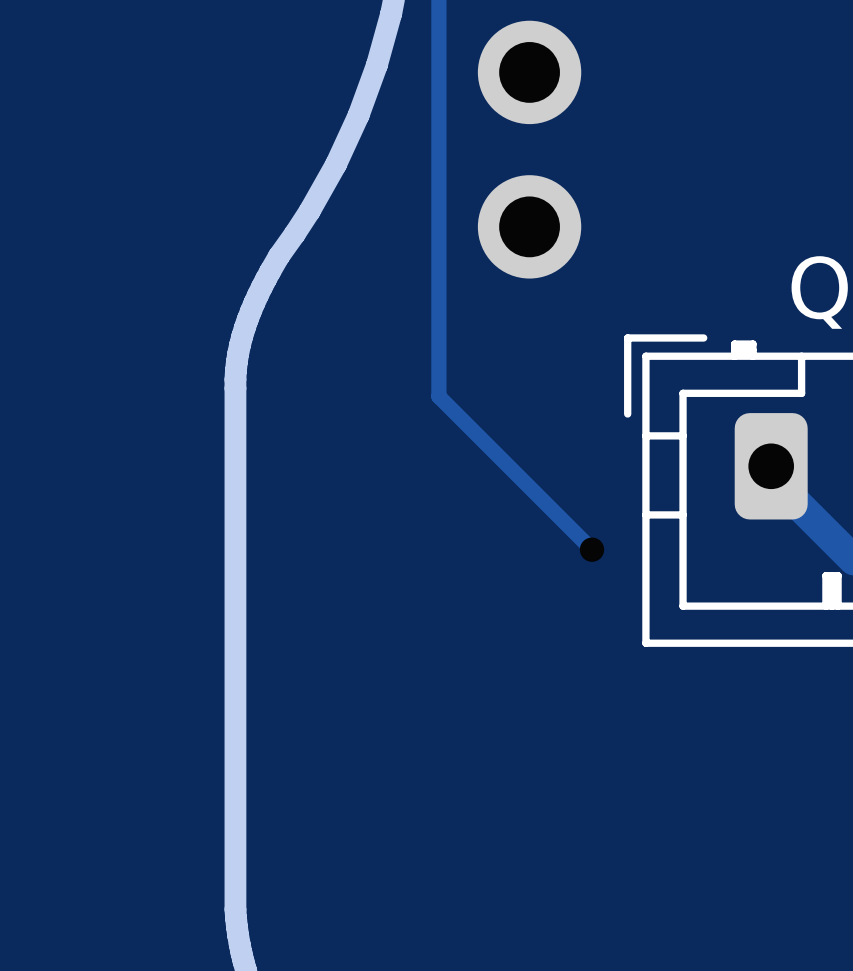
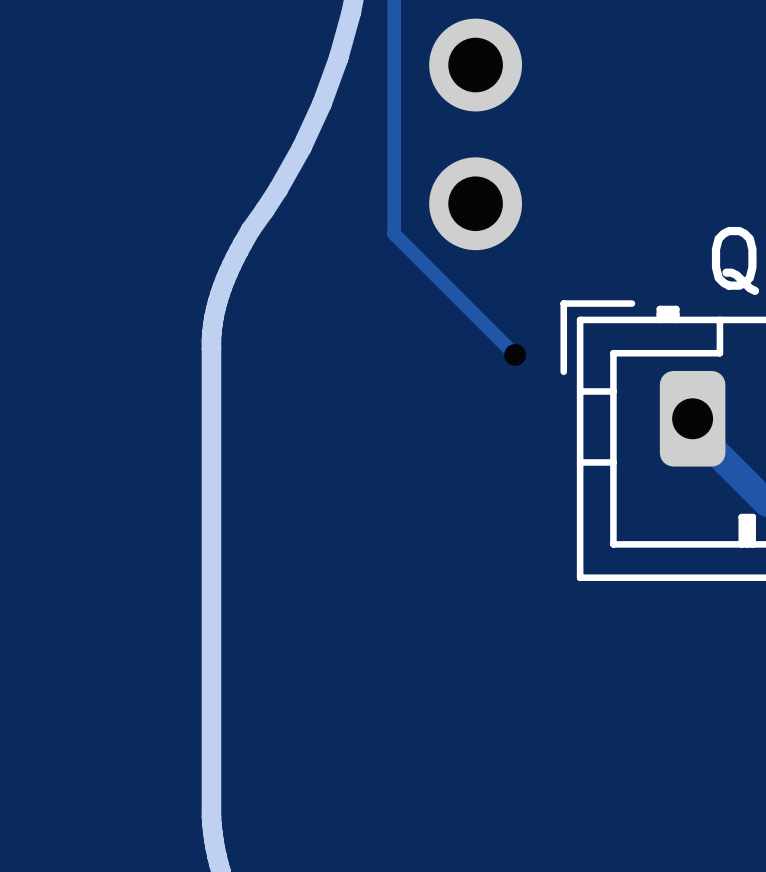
track: (438, 260) (438, 396) (592, 549) -> (394, 234) (515, 354)
via position: (592, 549) -> (515, 354)

